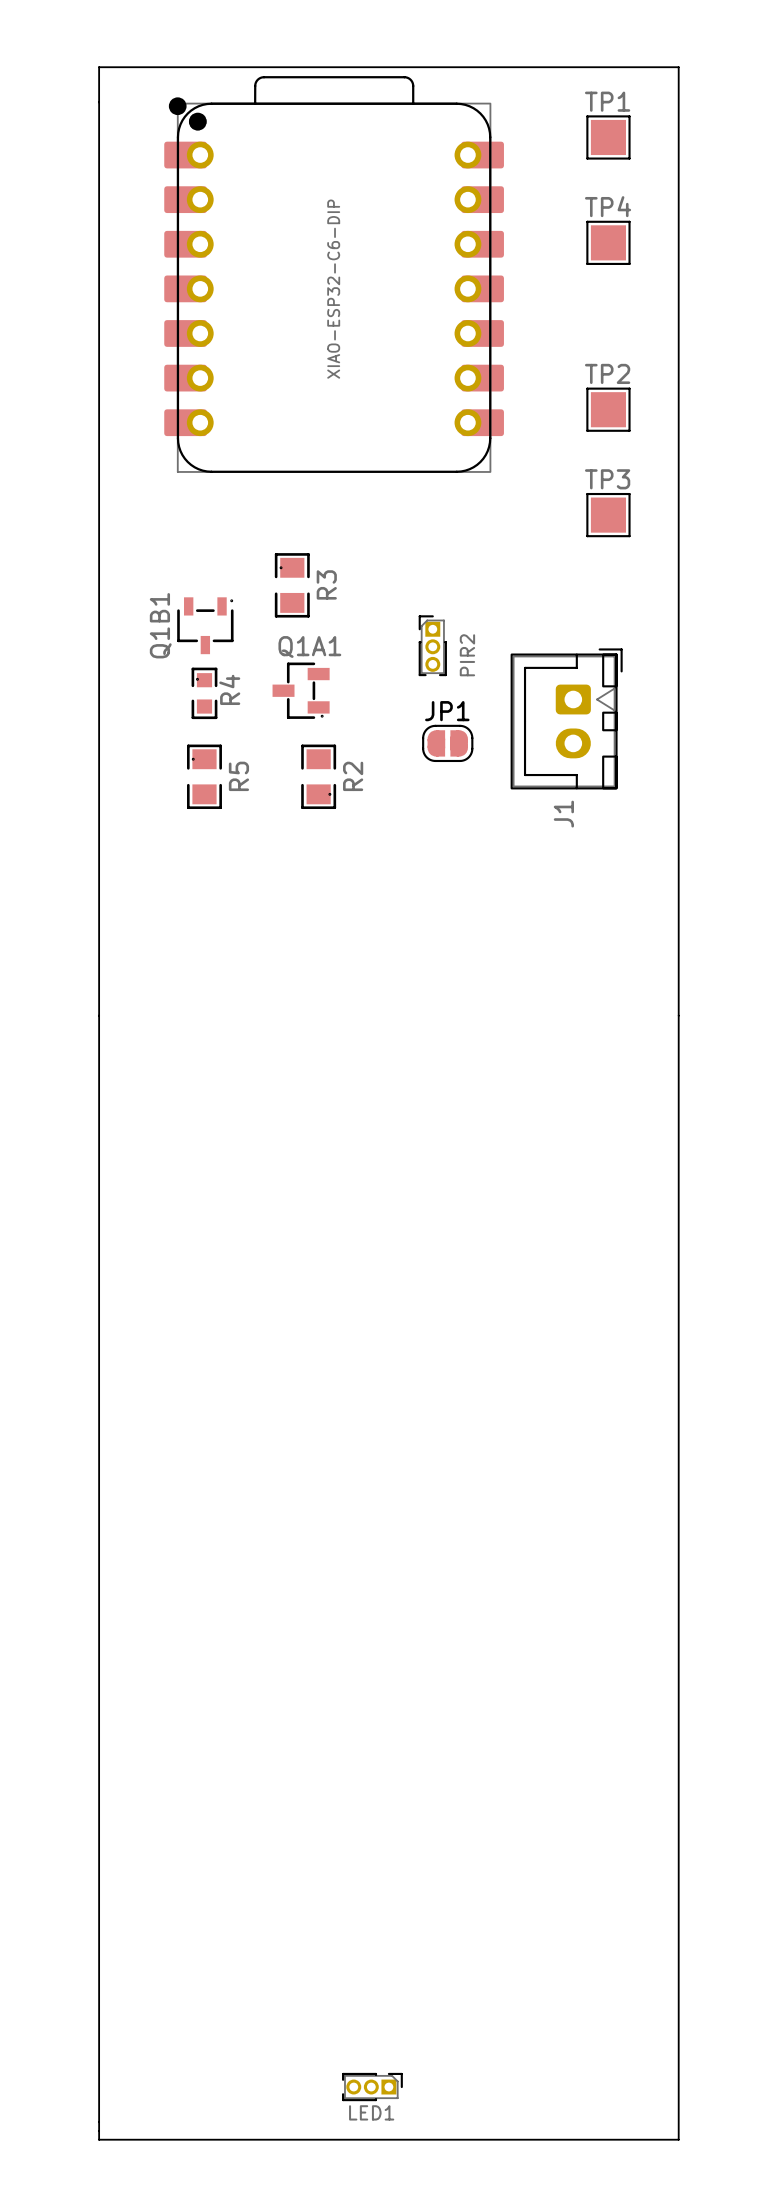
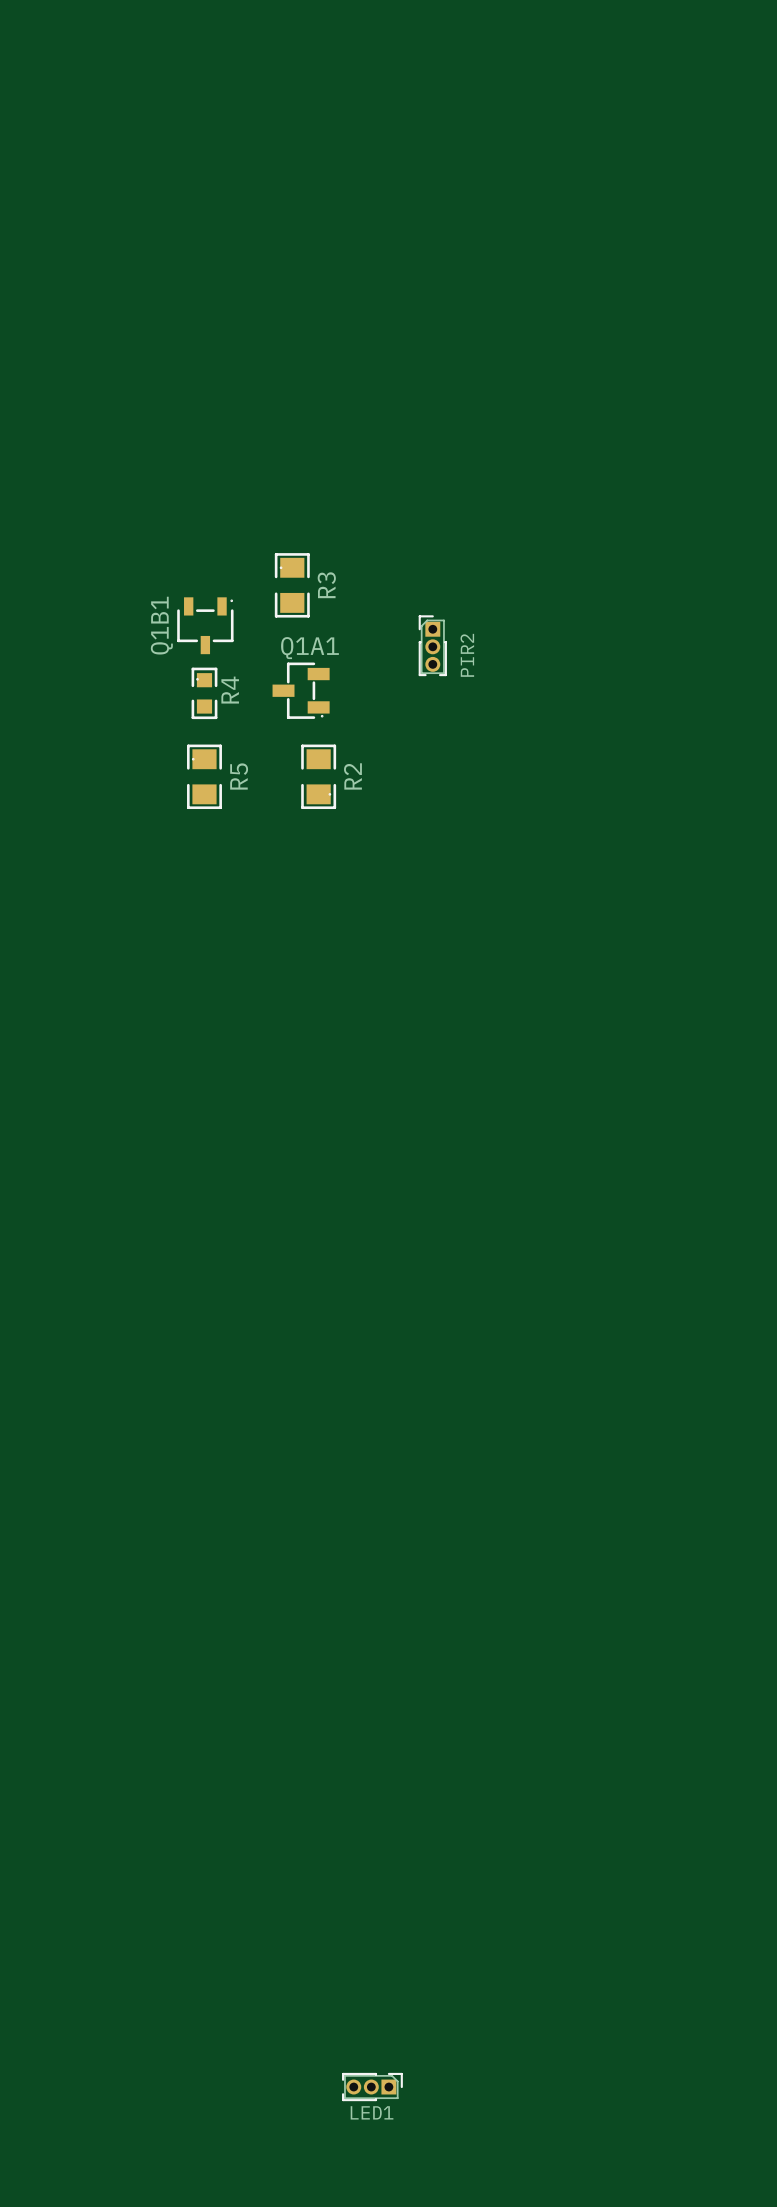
board edge: (99, 67) (99, 2139) (678, 2139) (678, 67) (99, 67) -> none
TP1: (608, 137) -> none
TP4: (608, 242) -> none
part: XIAO-ESP32-C6-DIP (334, 274) -> none
TP2: (608, 409) -> none
TP3: (608, 515) -> none
J1: (566, 718) -> none
JP1: (447, 743) -> none

